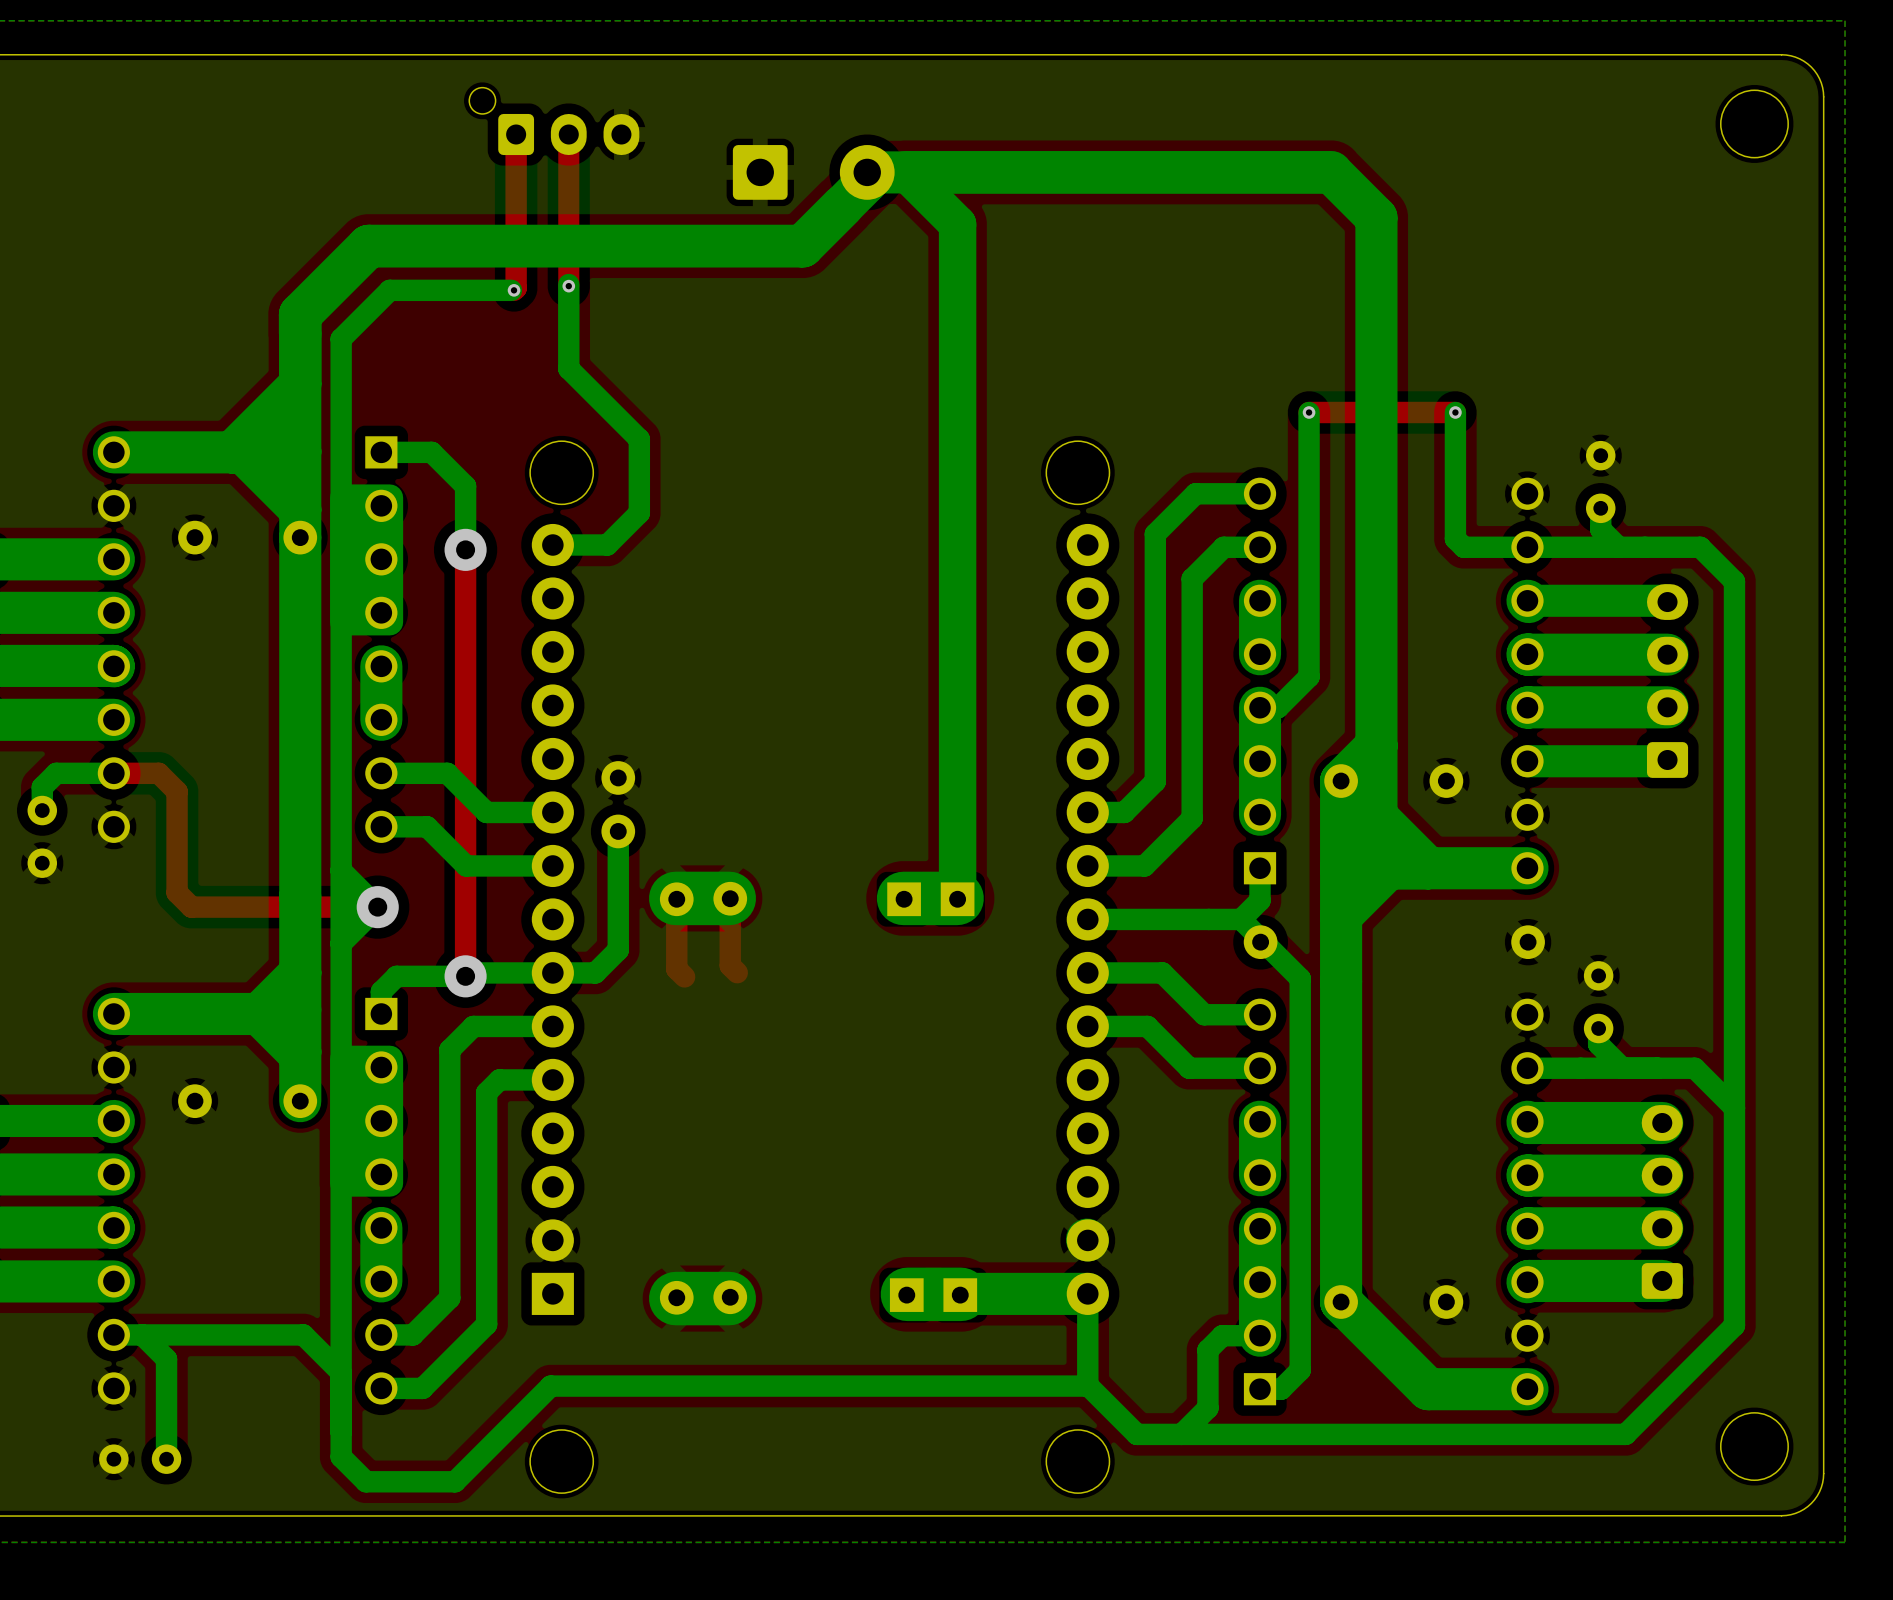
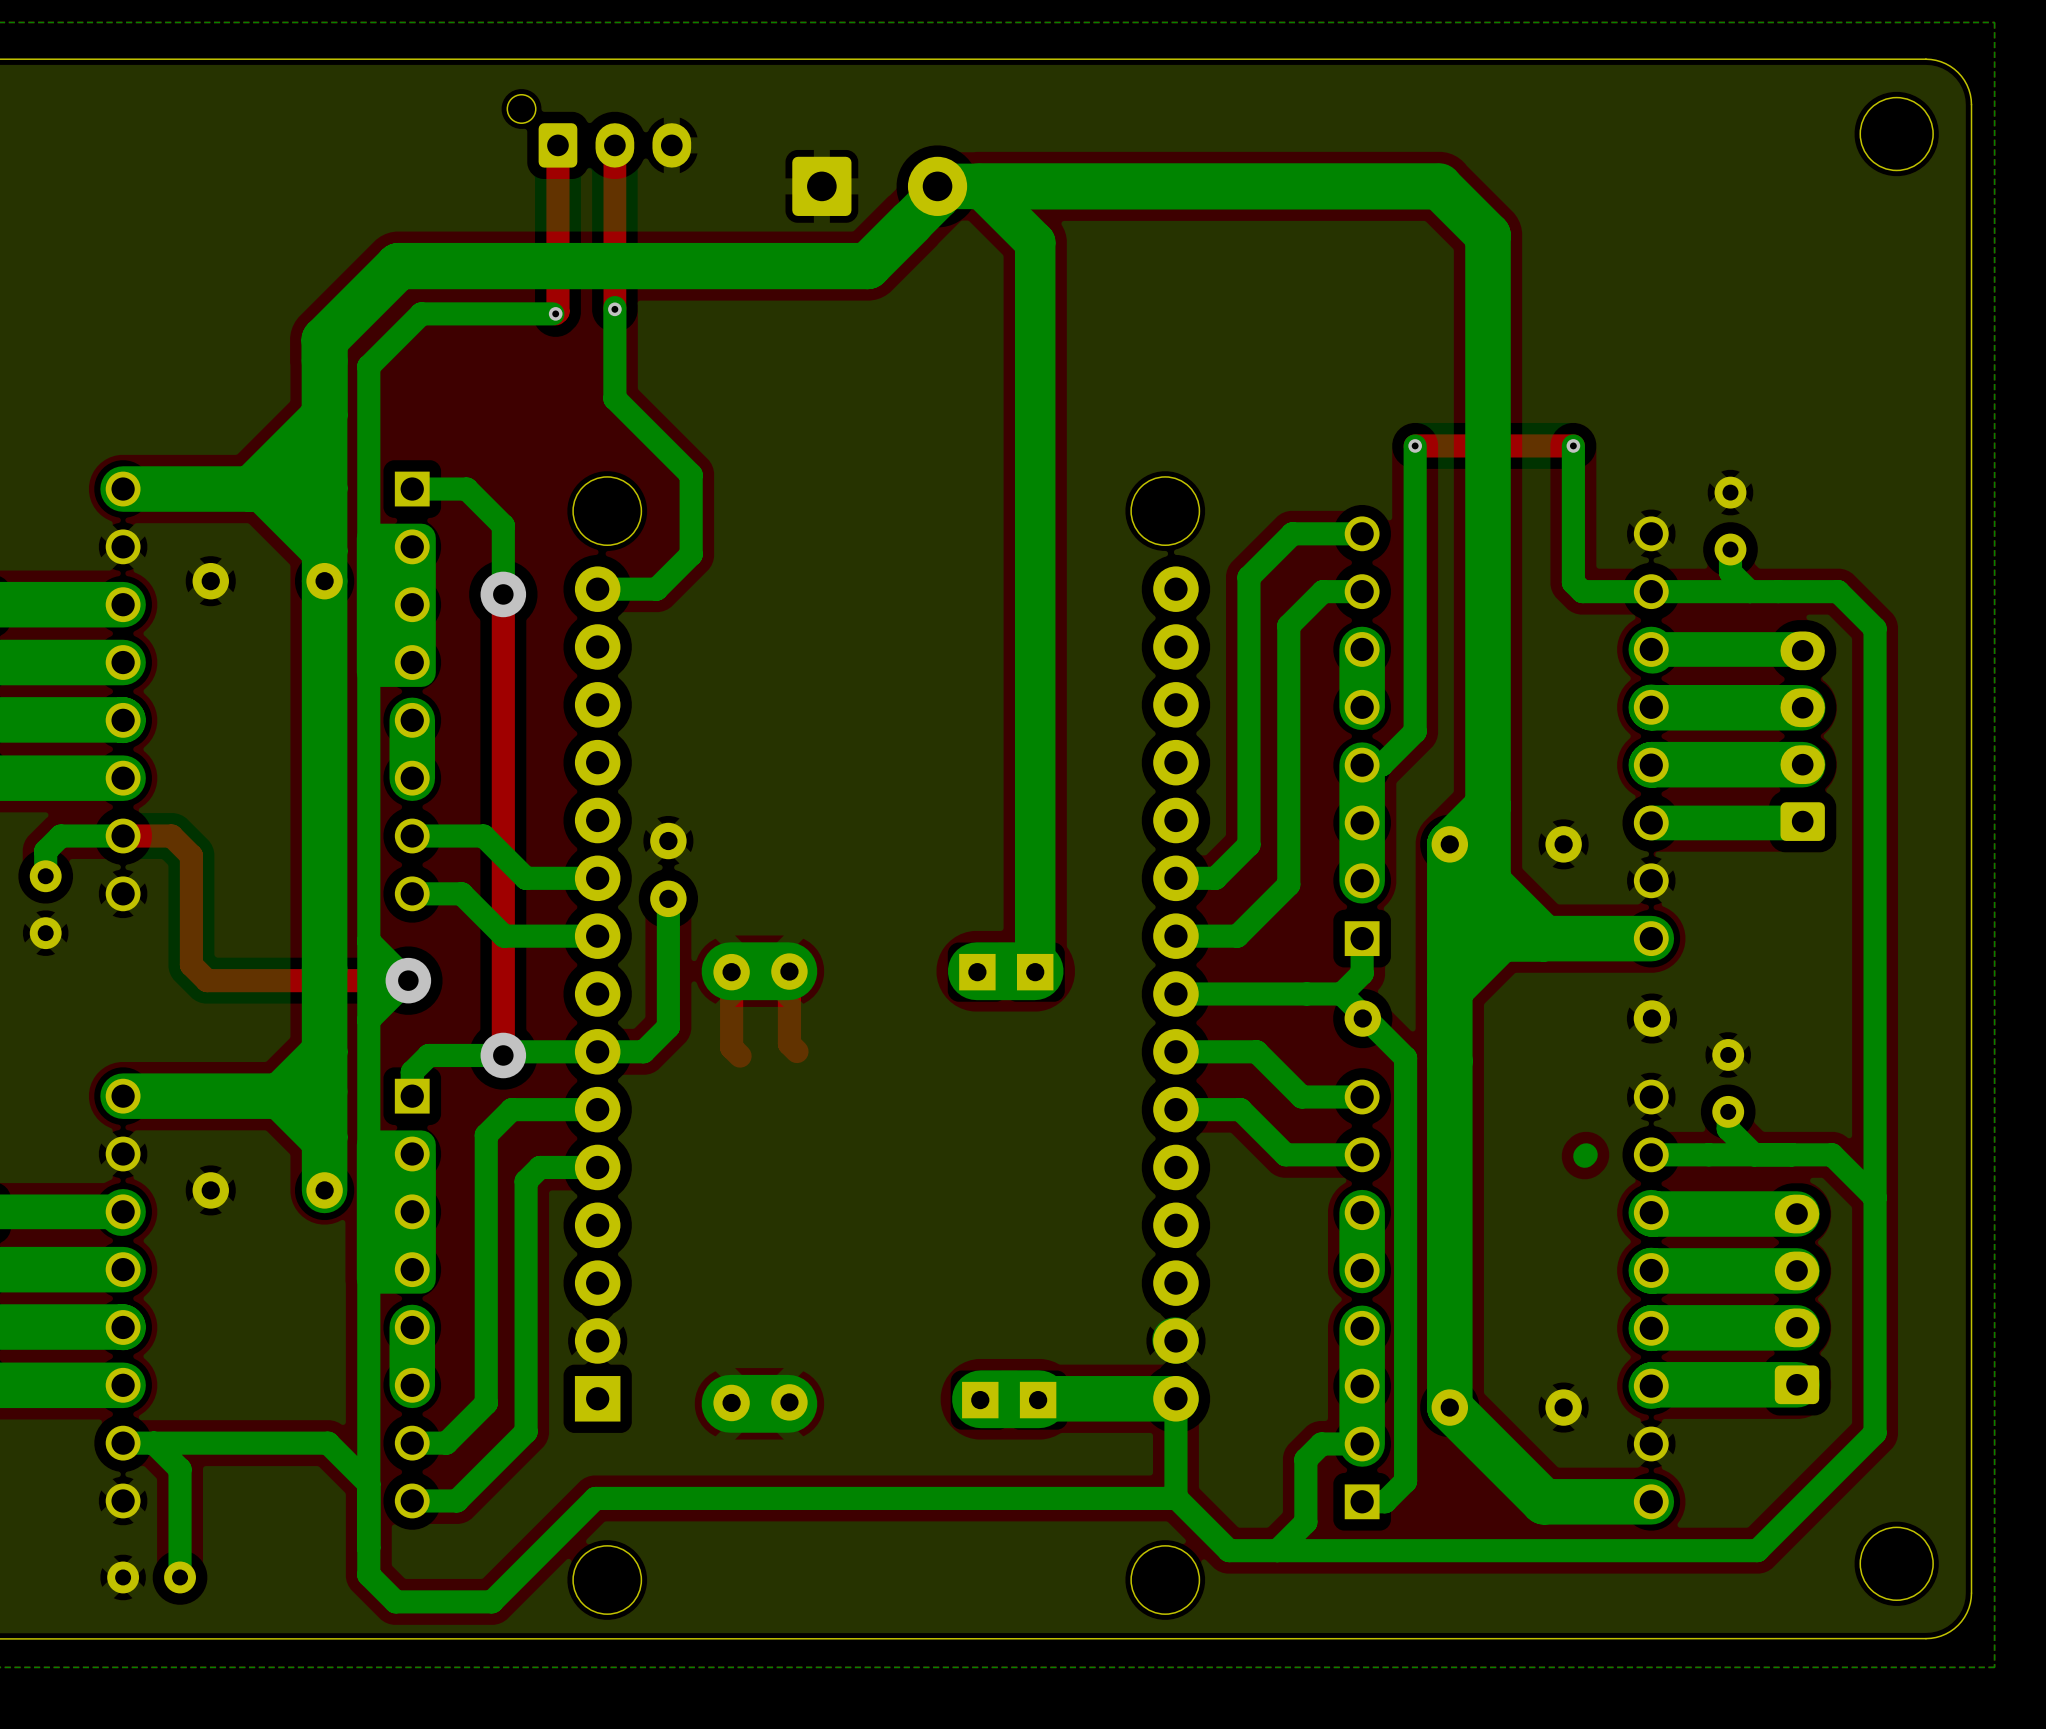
bottom track: none -> (1586, 1154) (1584, 1156)

